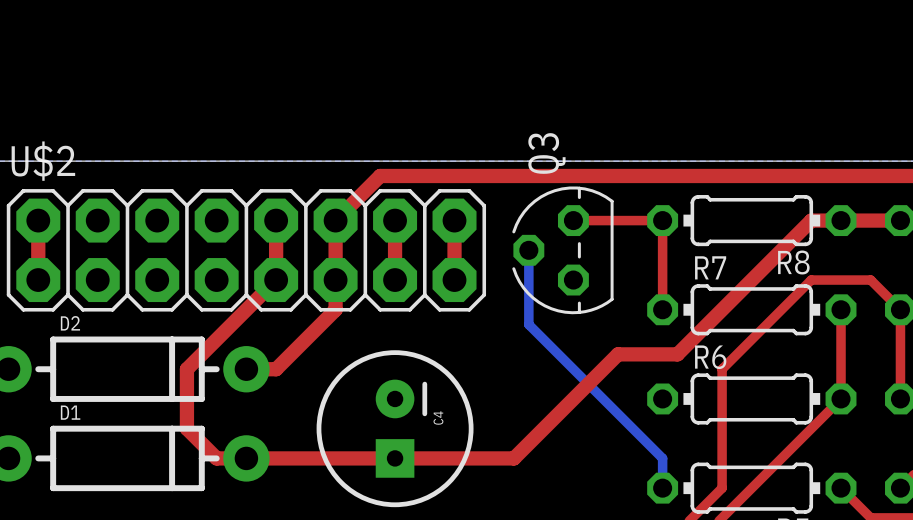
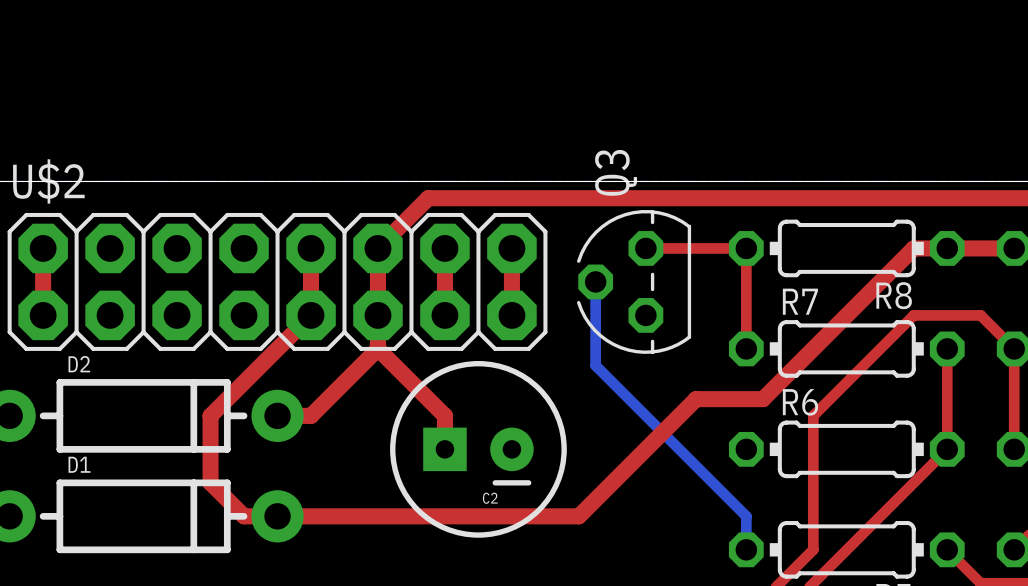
top track: none -> (377, 348) (444, 415) (444, 449)
C2: none -> (478, 449)
C4: (395, 428) -> none

